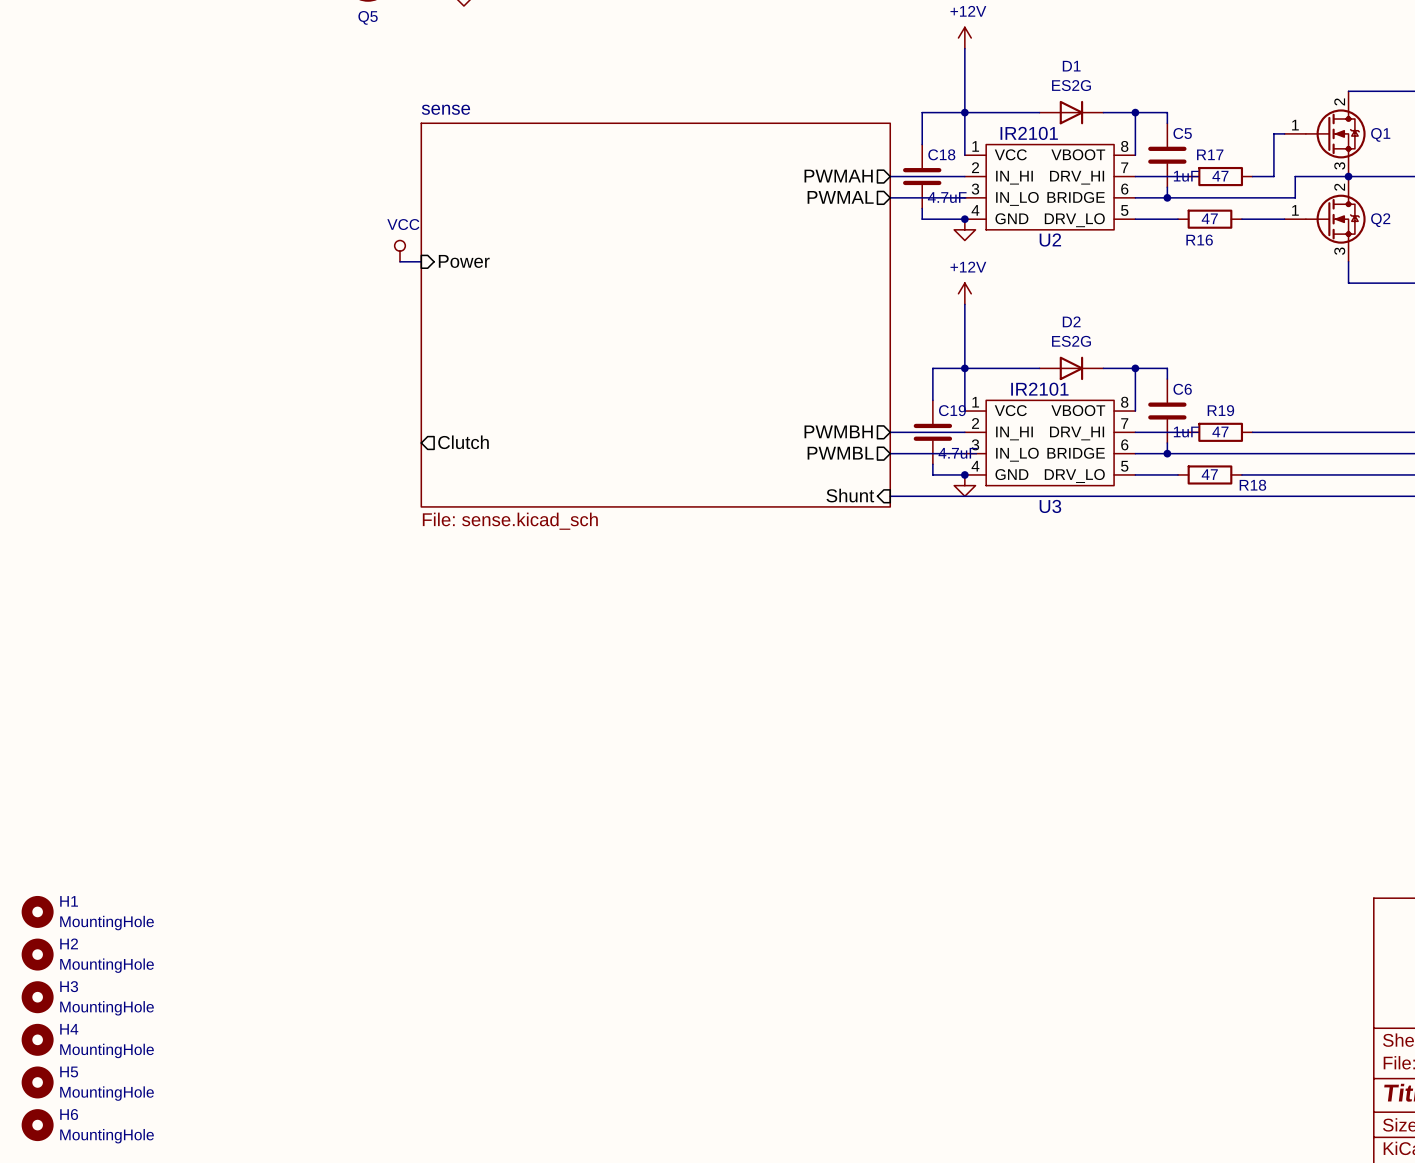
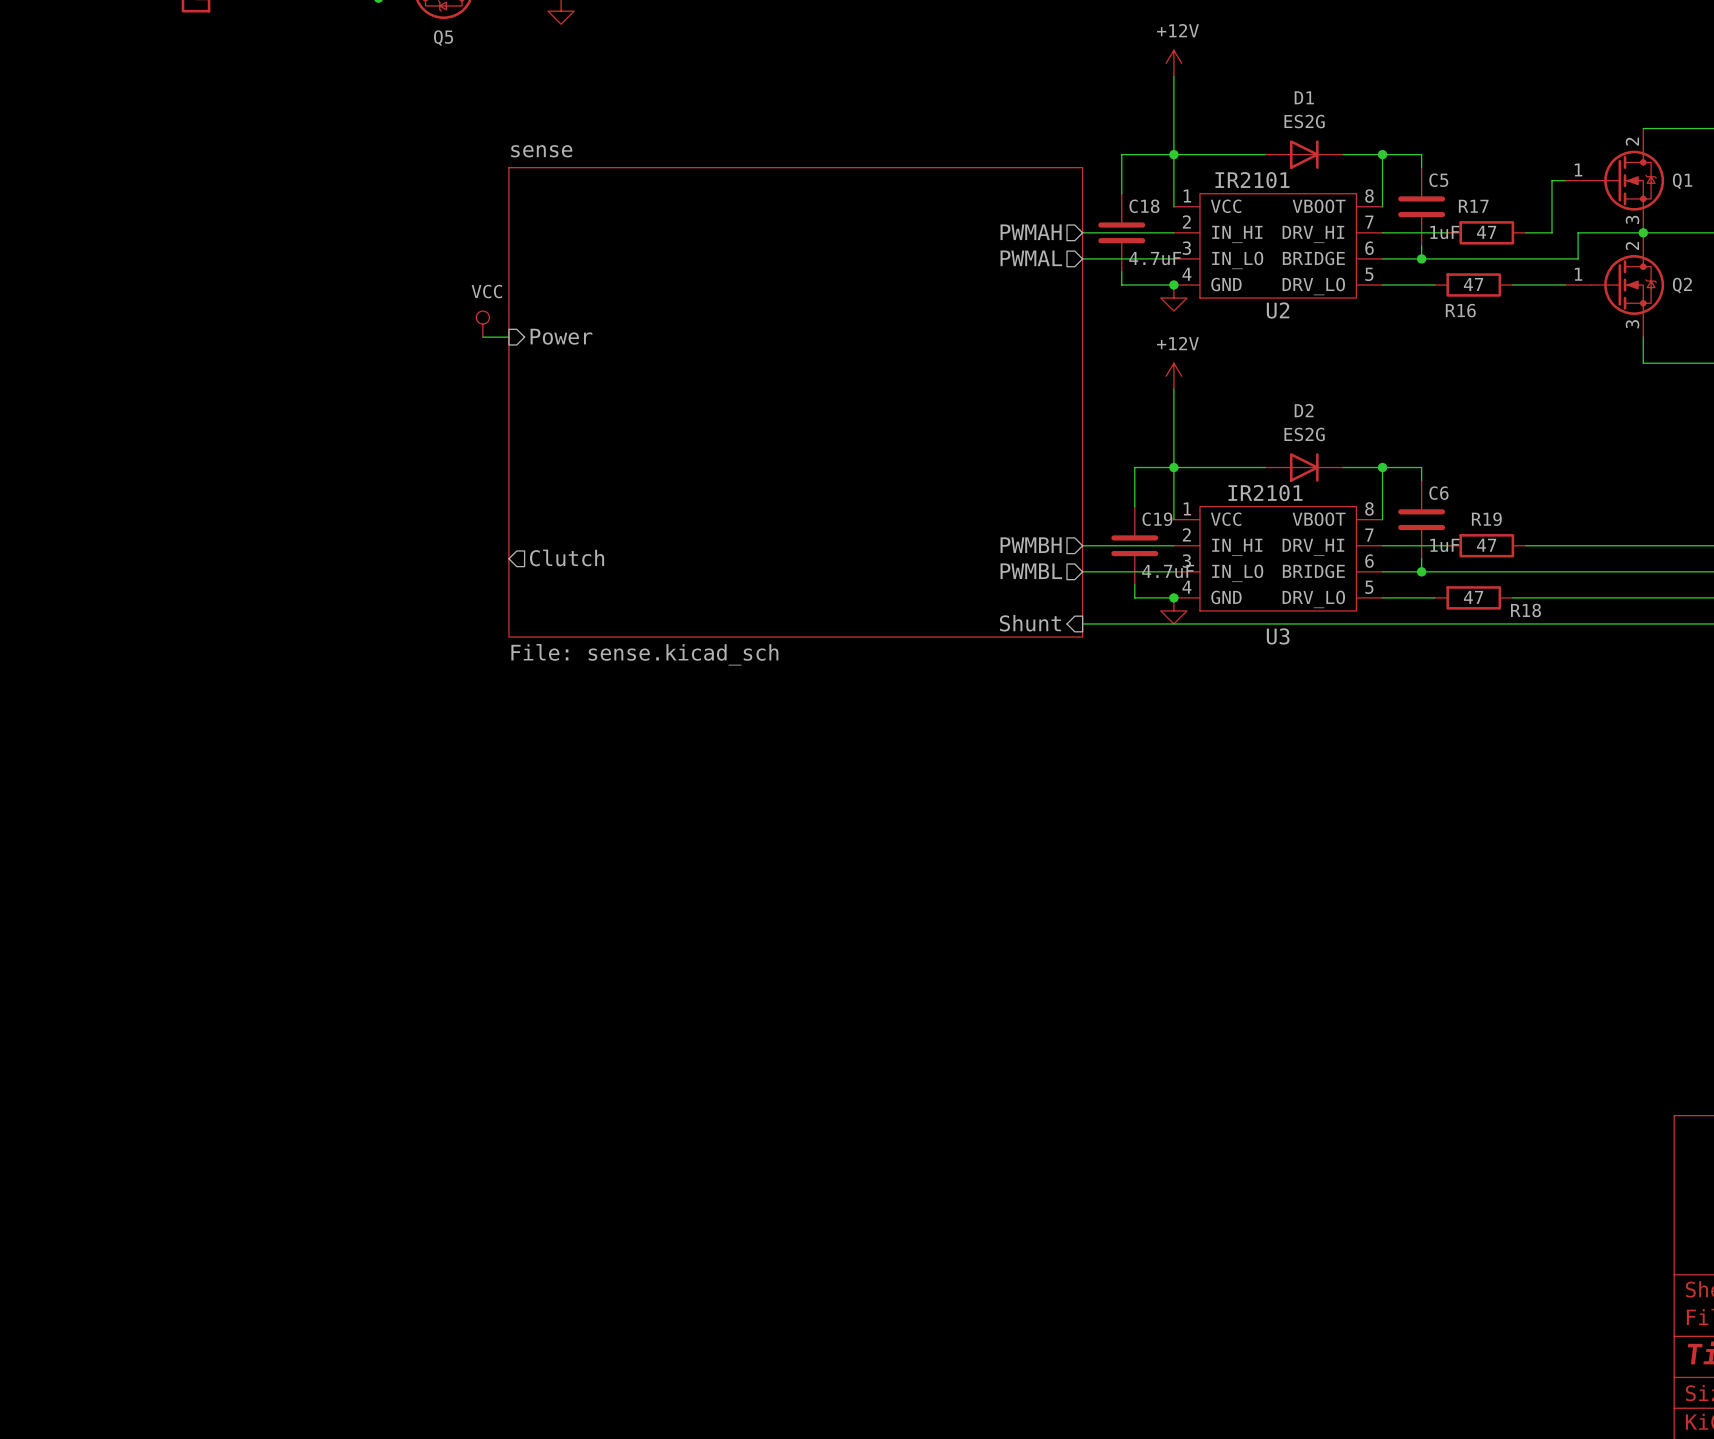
H1: MountingHole (37, 911) -> none
H2: MountingHole (37, 954) -> none
H3: MountingHole (37, 997) -> none
H4: MountingHole (37, 1039) -> none
H5: MountingHole (37, 1082) -> none
H6: MountingHole (37, 1125) -> none

